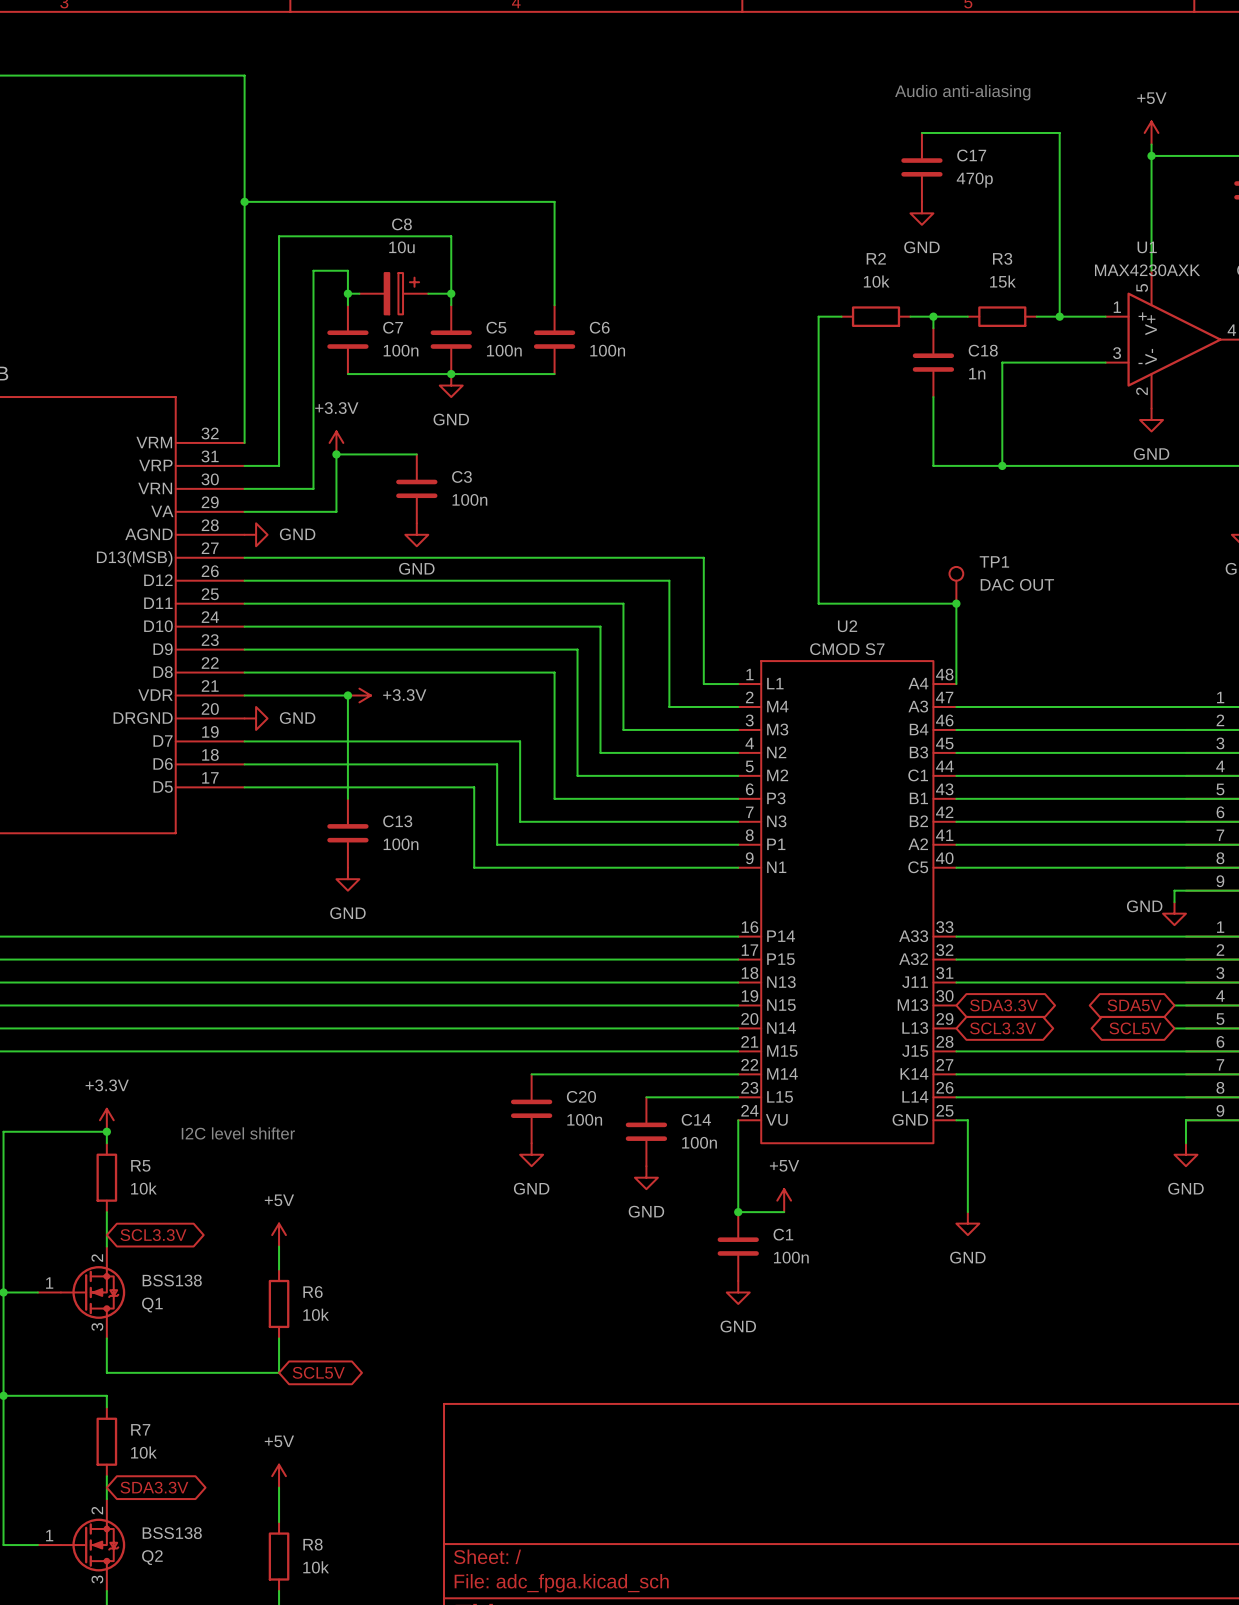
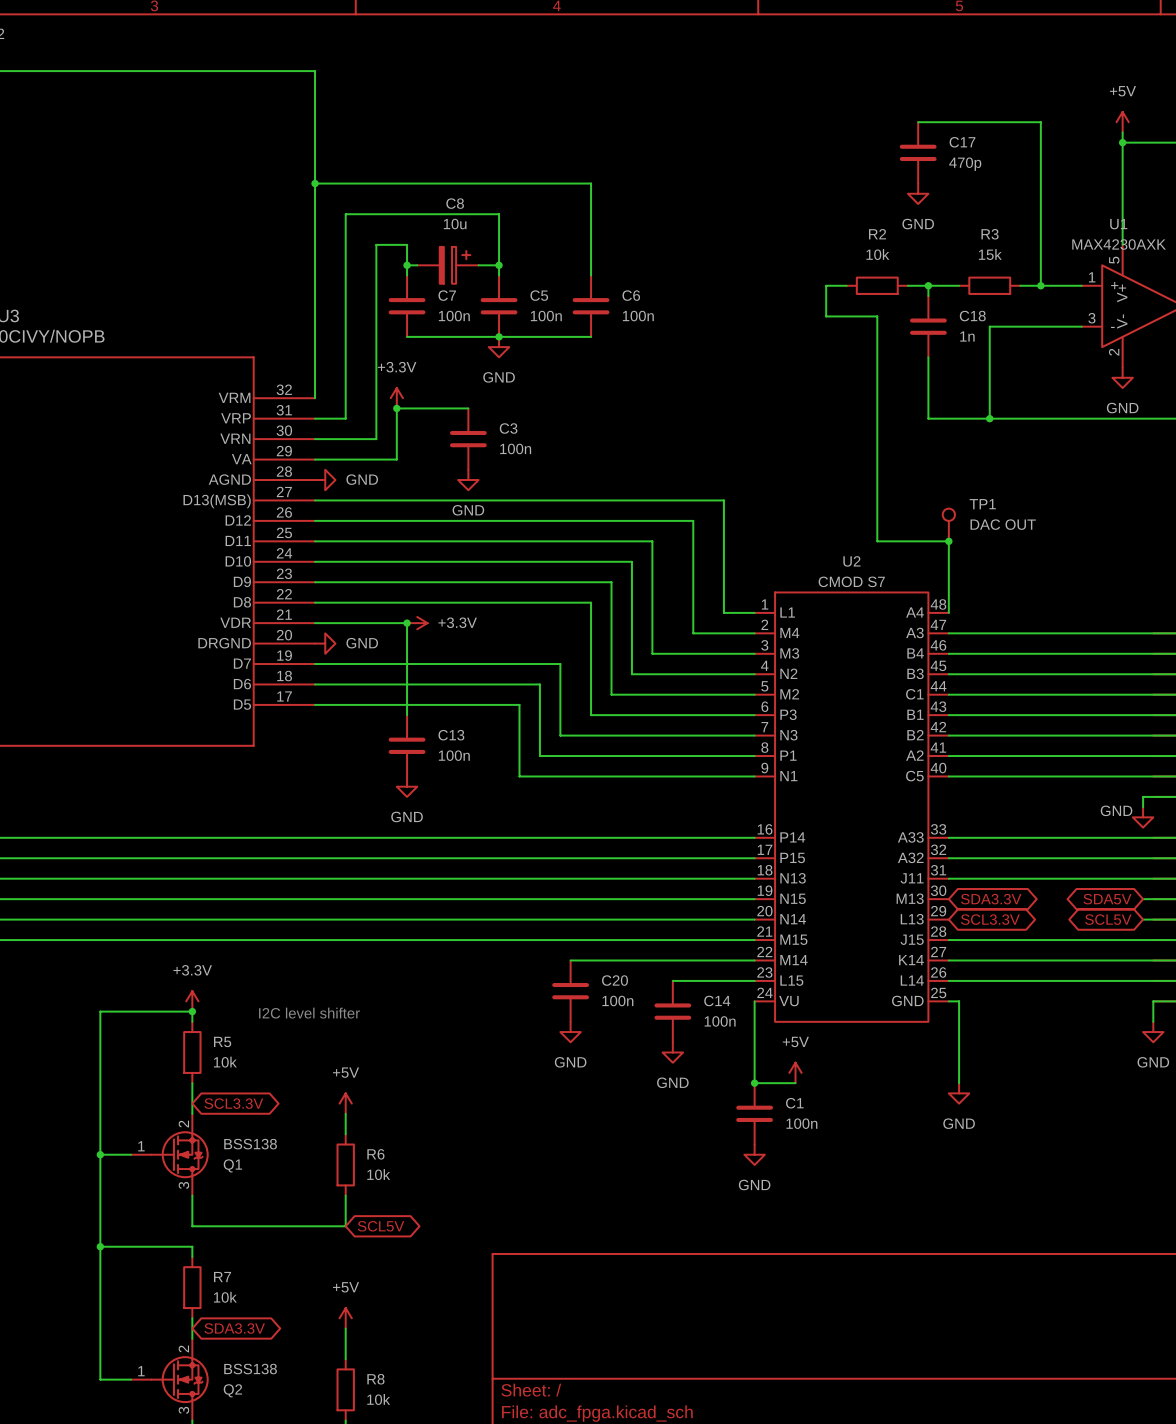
text: Audio anti-aliasing (962, 92) -> none
wire: (818, 351) (818, 603) (876, 603) -> (826, 316) (877, 316) (877, 541)

